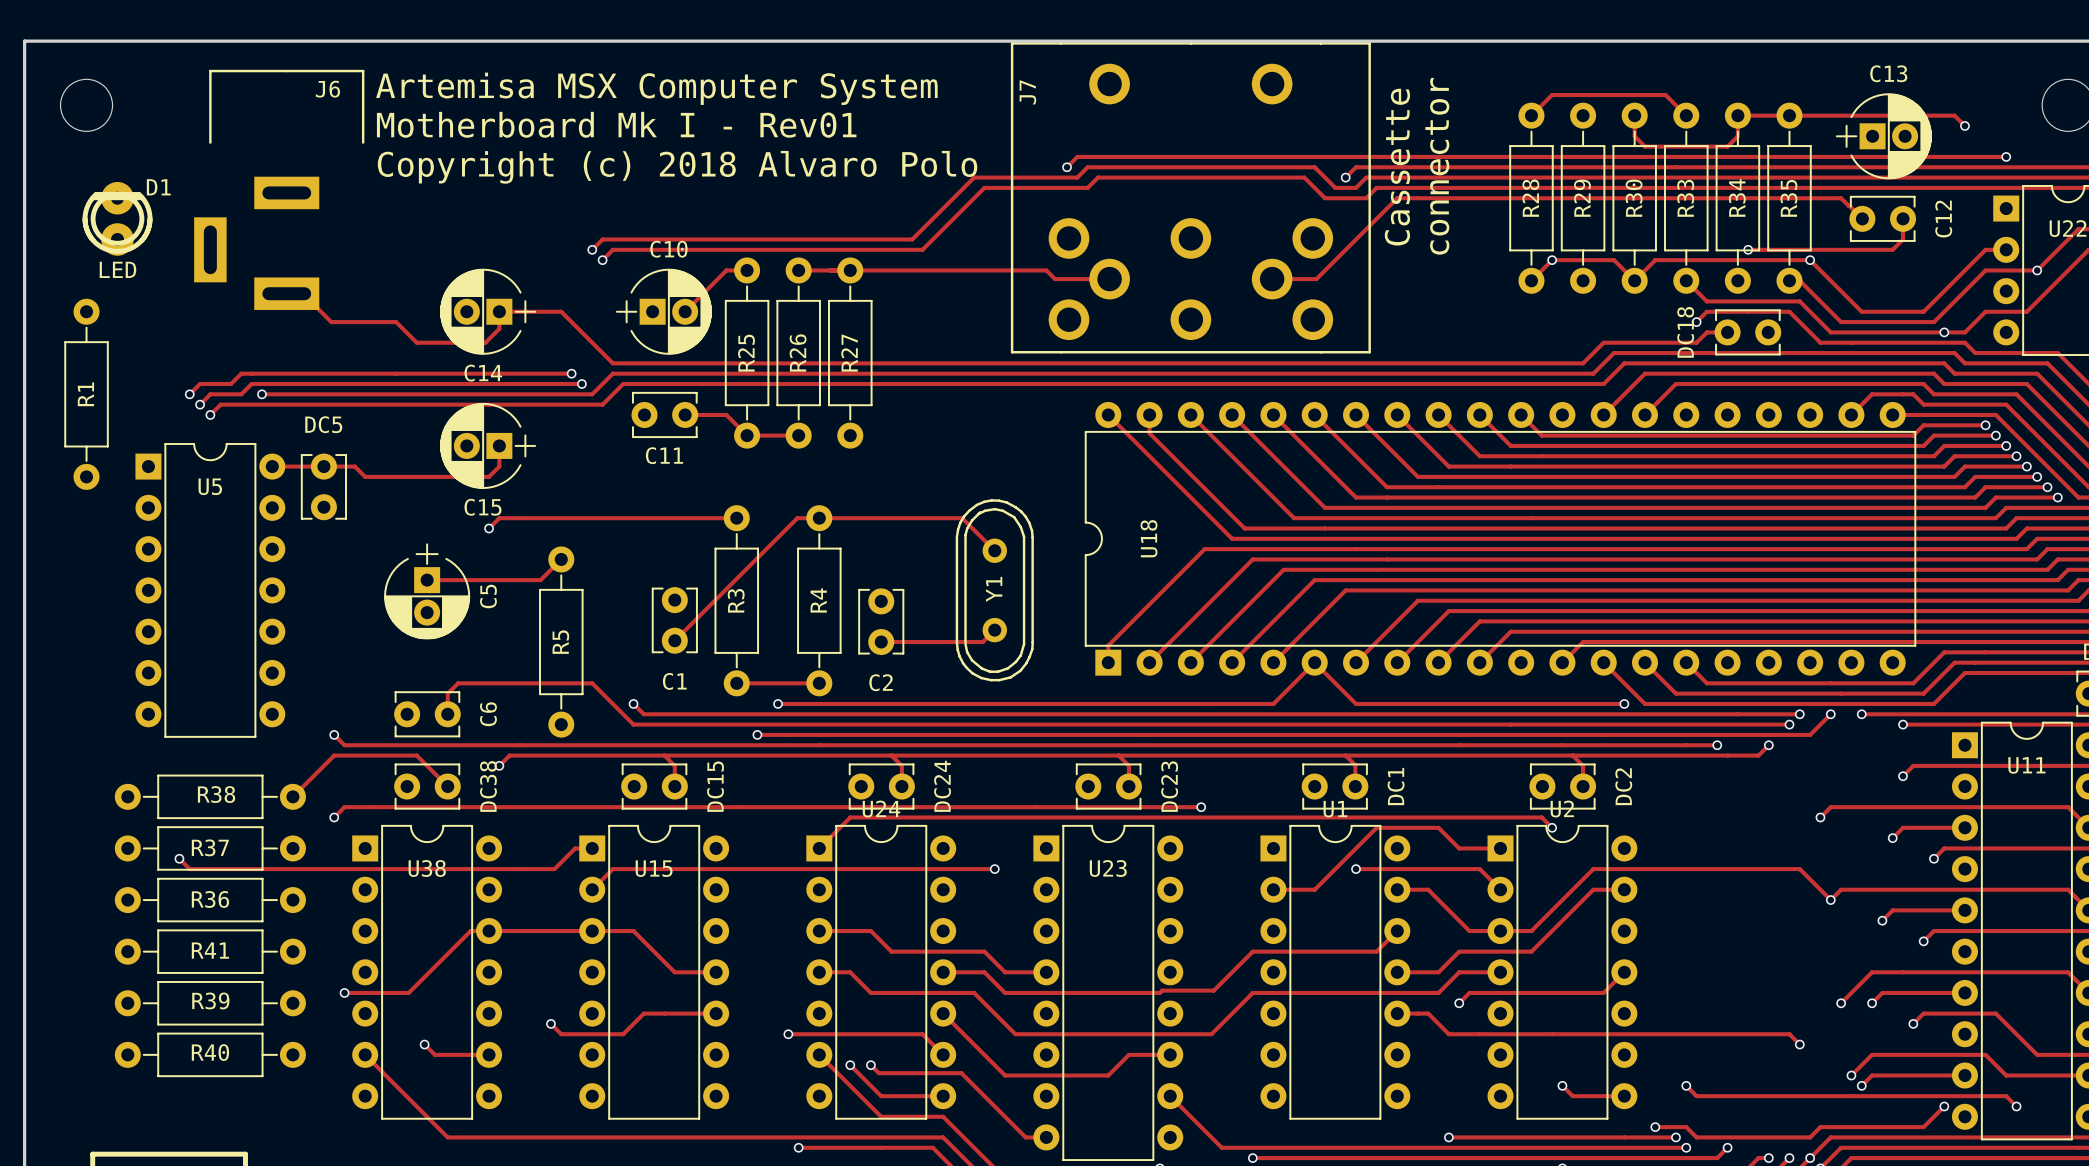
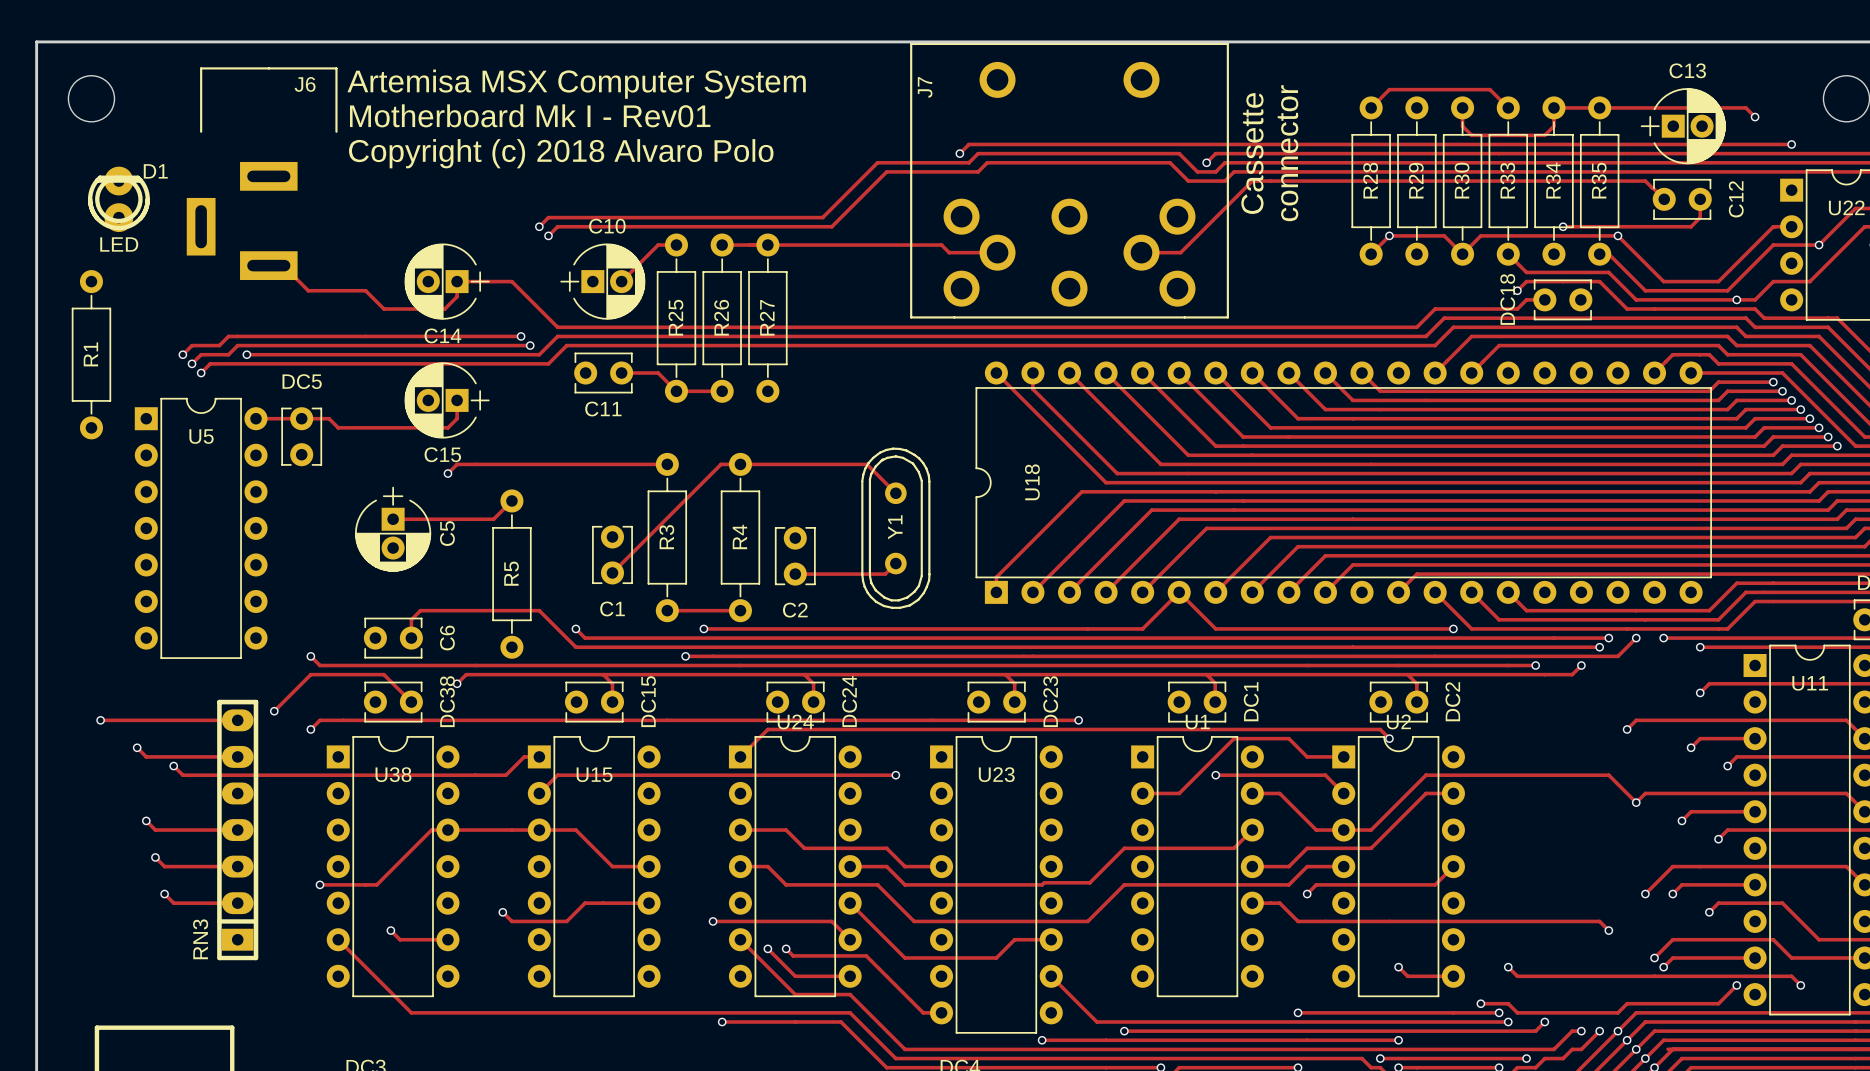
R38: (210, 796) -> none
via: none -> (274, 711)
track: none -> (100, 720) (237, 720)
via: none -> (100, 720)
track: none -> (137, 747) (146, 756) (237, 756)
via: none -> (137, 747)
R37: (210, 848) -> none
R36: (210, 900) -> none
track: none -> (146, 820) (155, 830) (237, 830)
via: none -> (146, 820)
RN3: none -> (237, 830)
R41: (210, 951) -> none
track: none -> (155, 857) (164, 866) (237, 866)
via: none -> (155, 857)
track: none -> (164, 894) (173, 903) (237, 903)
via: none -> (164, 894)
R39: (210, 1003) -> none
R40: (210, 1054) -> none

